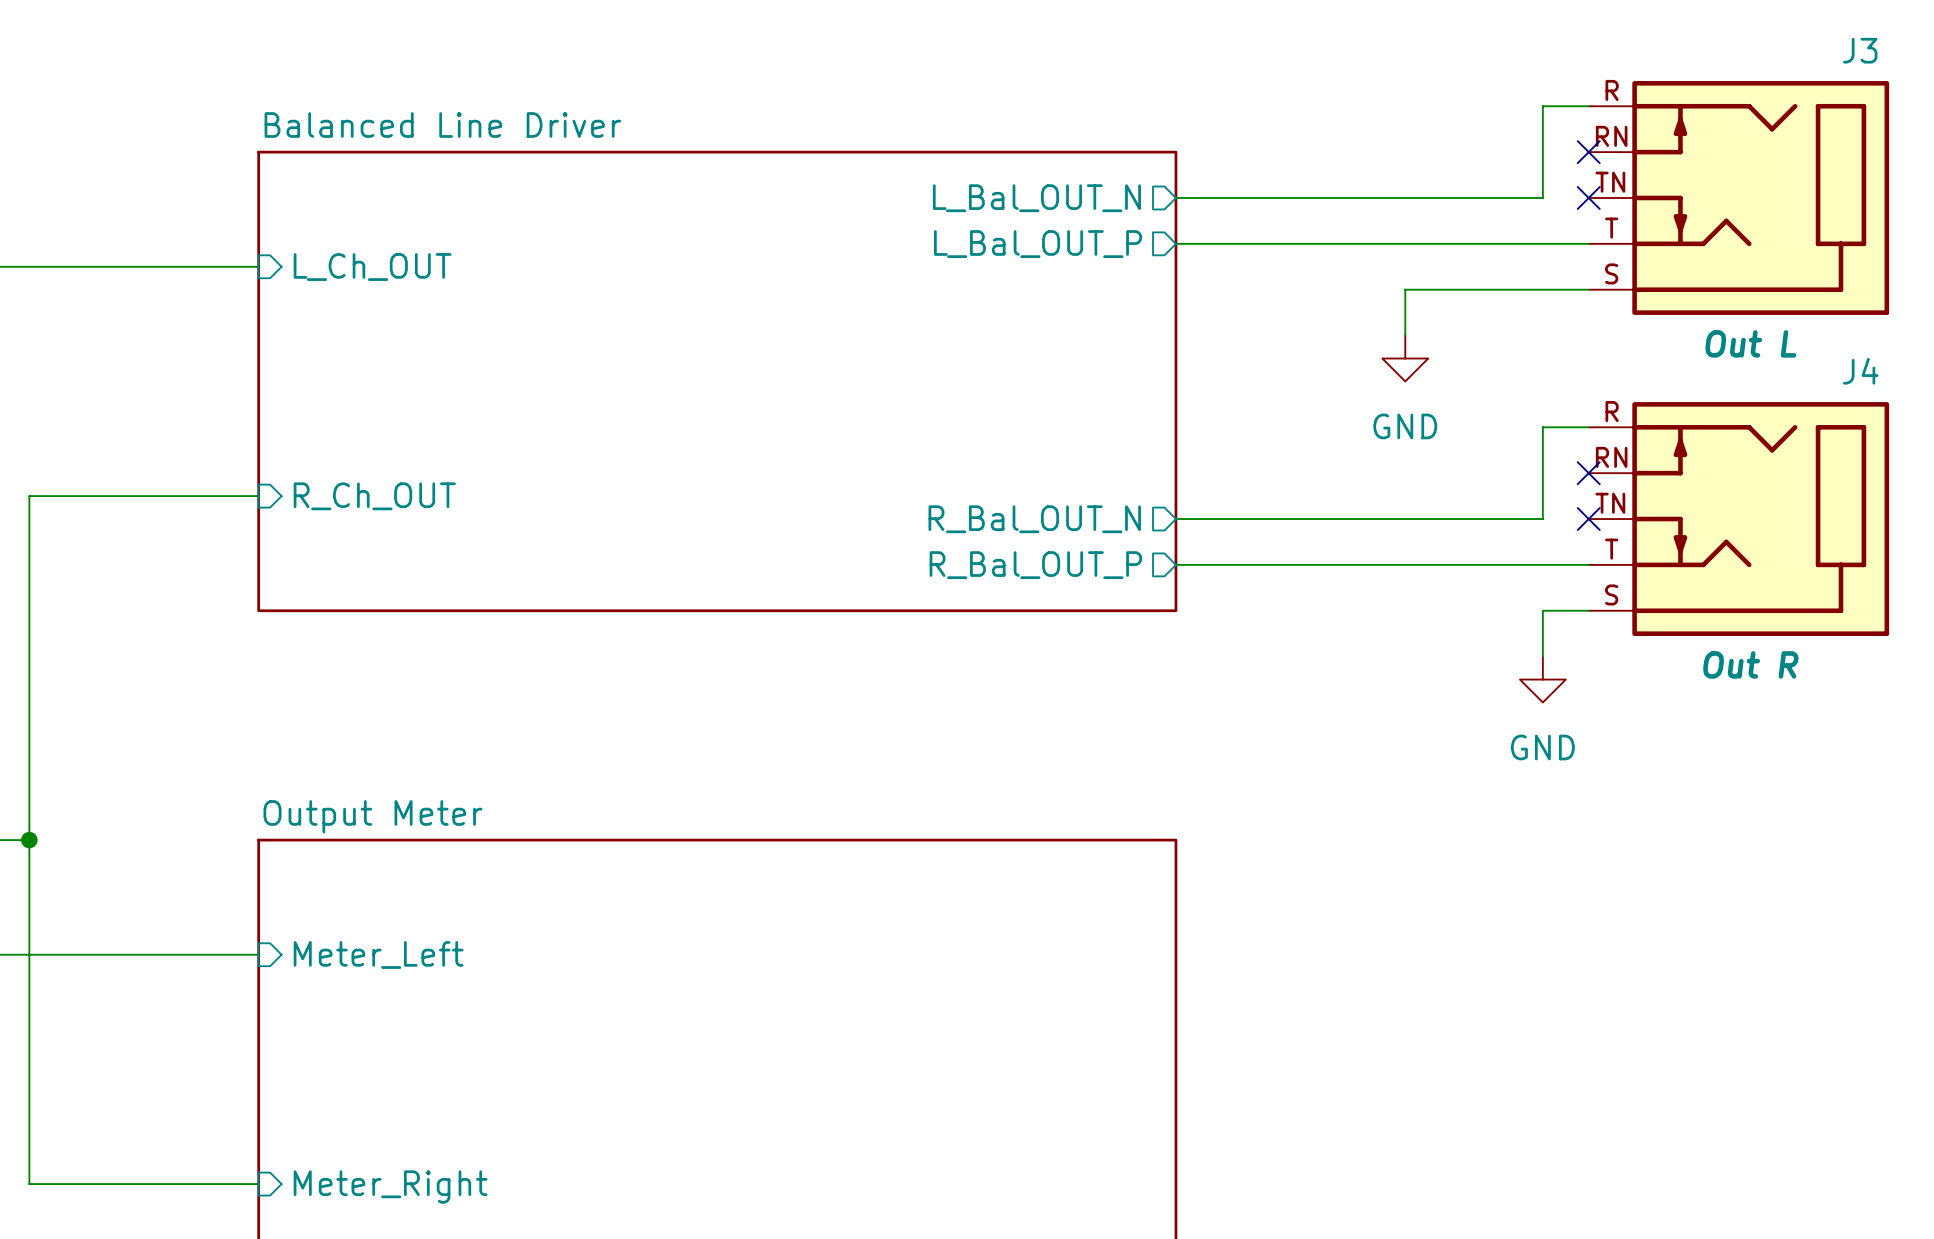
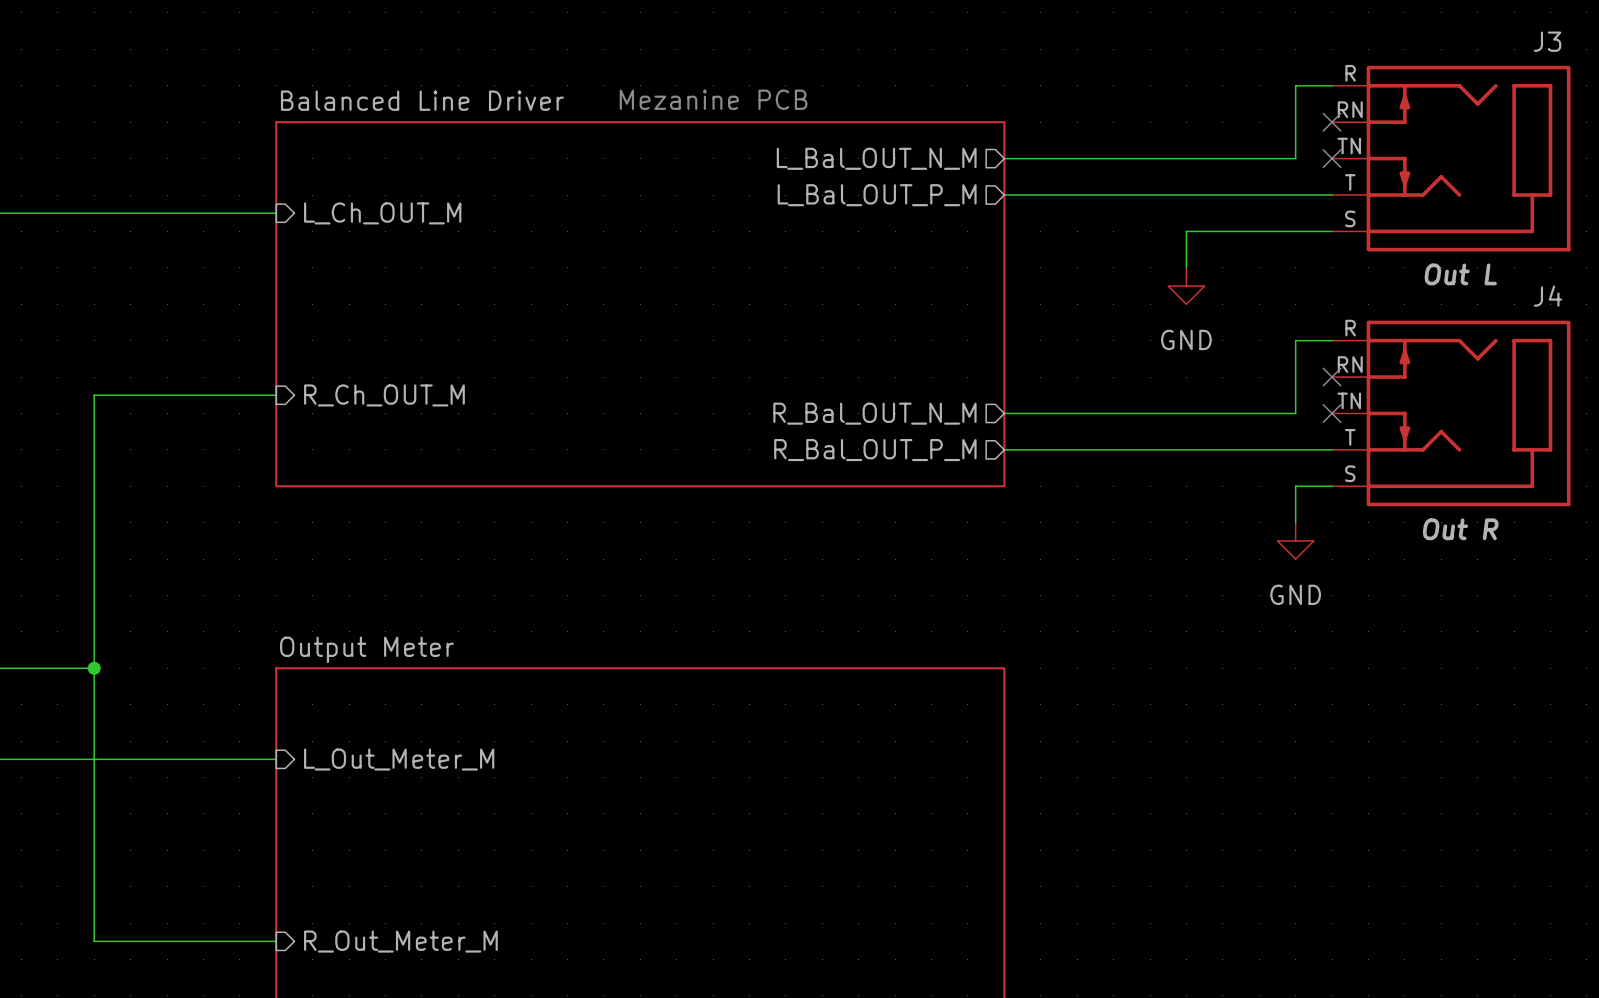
text: none -> Mezanine PCB (713, 99)
sheet pin: L_Bal_OUT_N (1036, 198) -> L_Bal_OUT_N_M (876, 158)
sheet pin: L_Bal_OUT_P (1038, 244) -> L_Bal_OUT_P_M (877, 195)
sheet pin: L_Ch_OUT (372, 267) -> L_Ch_OUT_M (382, 213)
sheet pin: R_Ch_OUT (374, 496) -> R_Ch_OUT_M (384, 395)
sheet pin: R_Bal_OUT_N (1034, 519) -> R_Bal_OUT_N_M (874, 413)
sheet pin: R_Bal_OUT_P (1035, 565) -> R_Bal_OUT_P_M (875, 450)
sheet pin: Meter_Left (378, 954) -> L_Out_Meter_M (399, 759)
sheet pin: Meter_Right (390, 1187) -> R_Out_Meter_M (400, 941)

